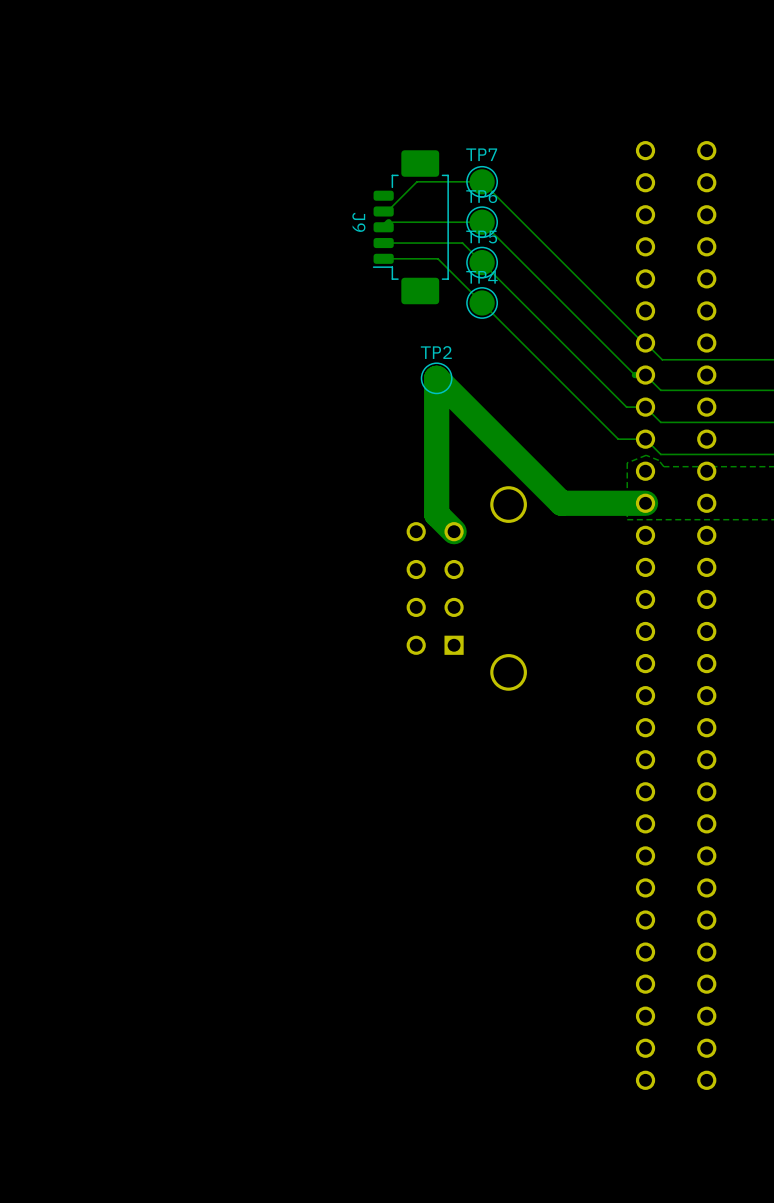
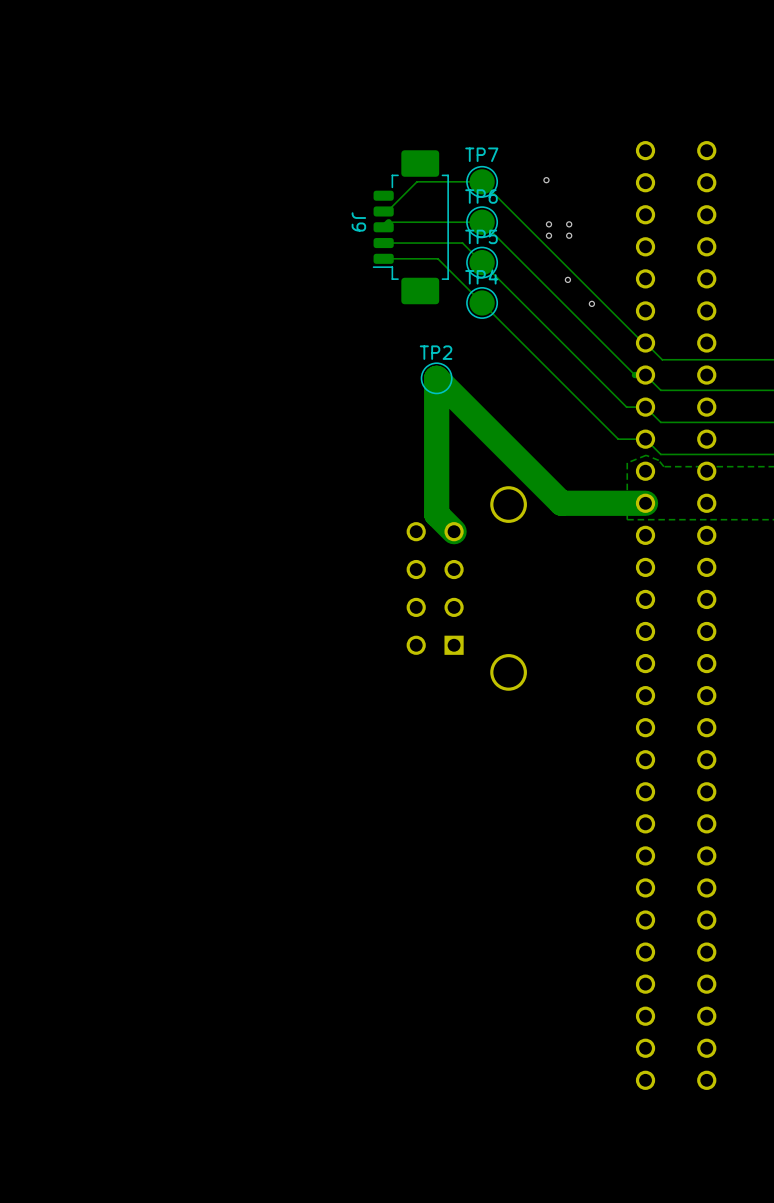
via: none -> (546, 180)
via: none -> (548, 224)
via: none -> (569, 224)
via: none -> (548, 235)
via: none -> (569, 235)
via: none -> (567, 279)
via: none -> (591, 303)

